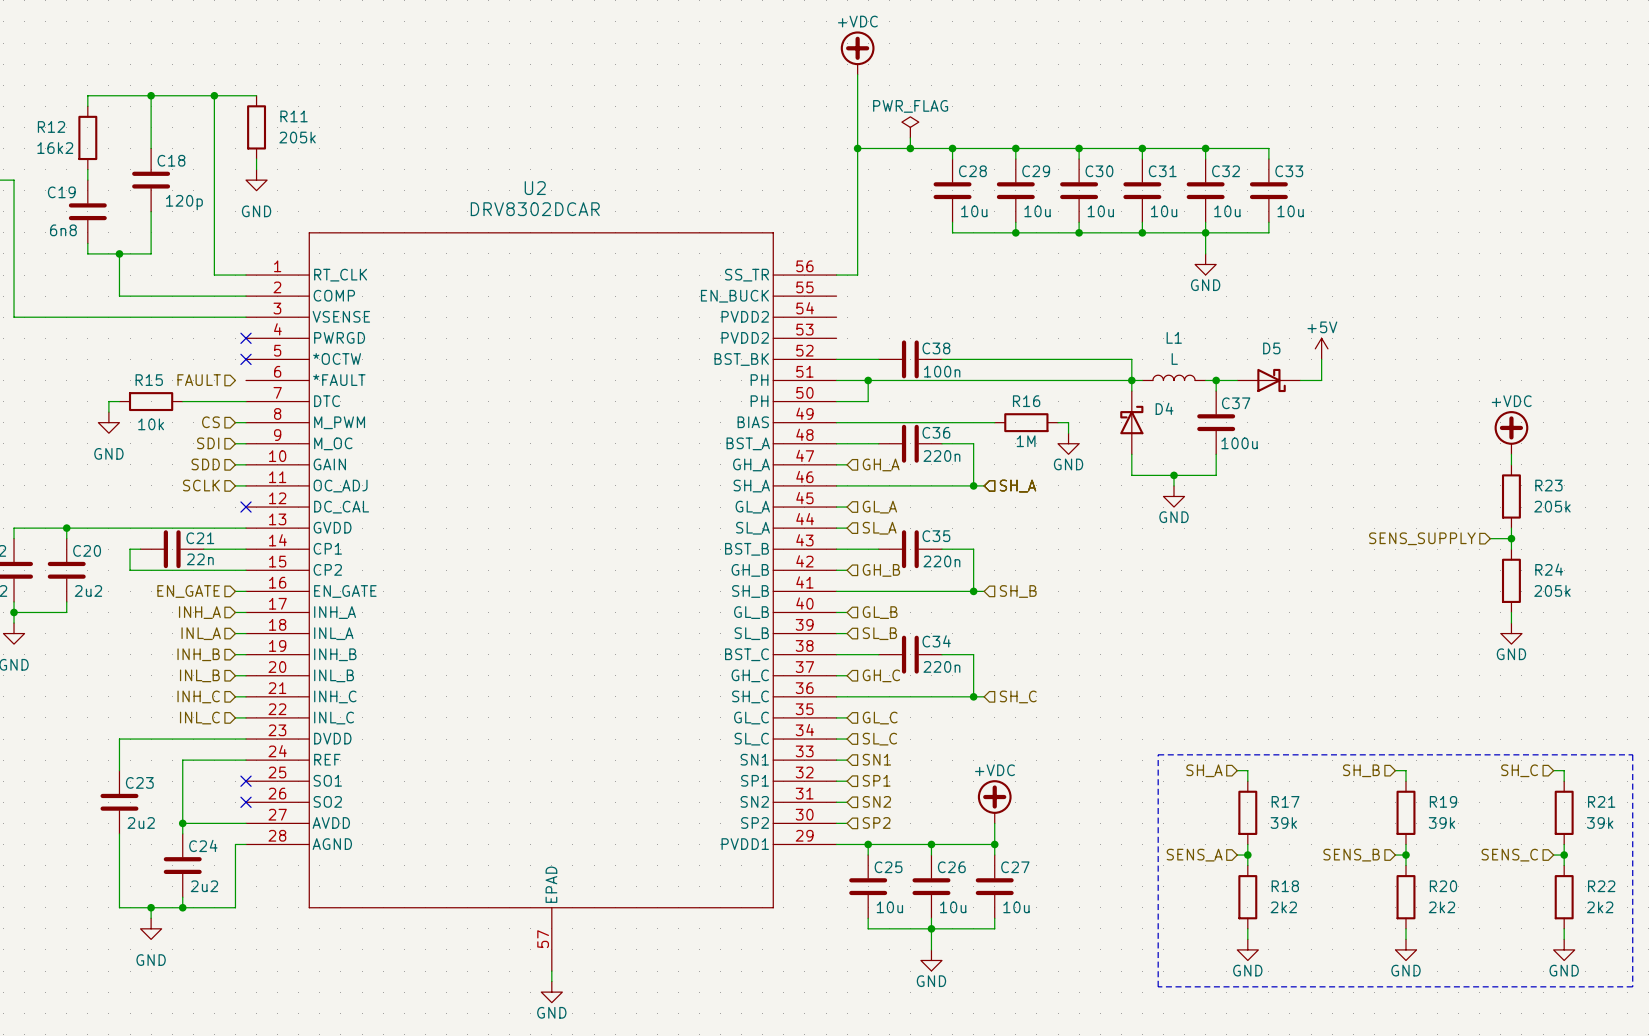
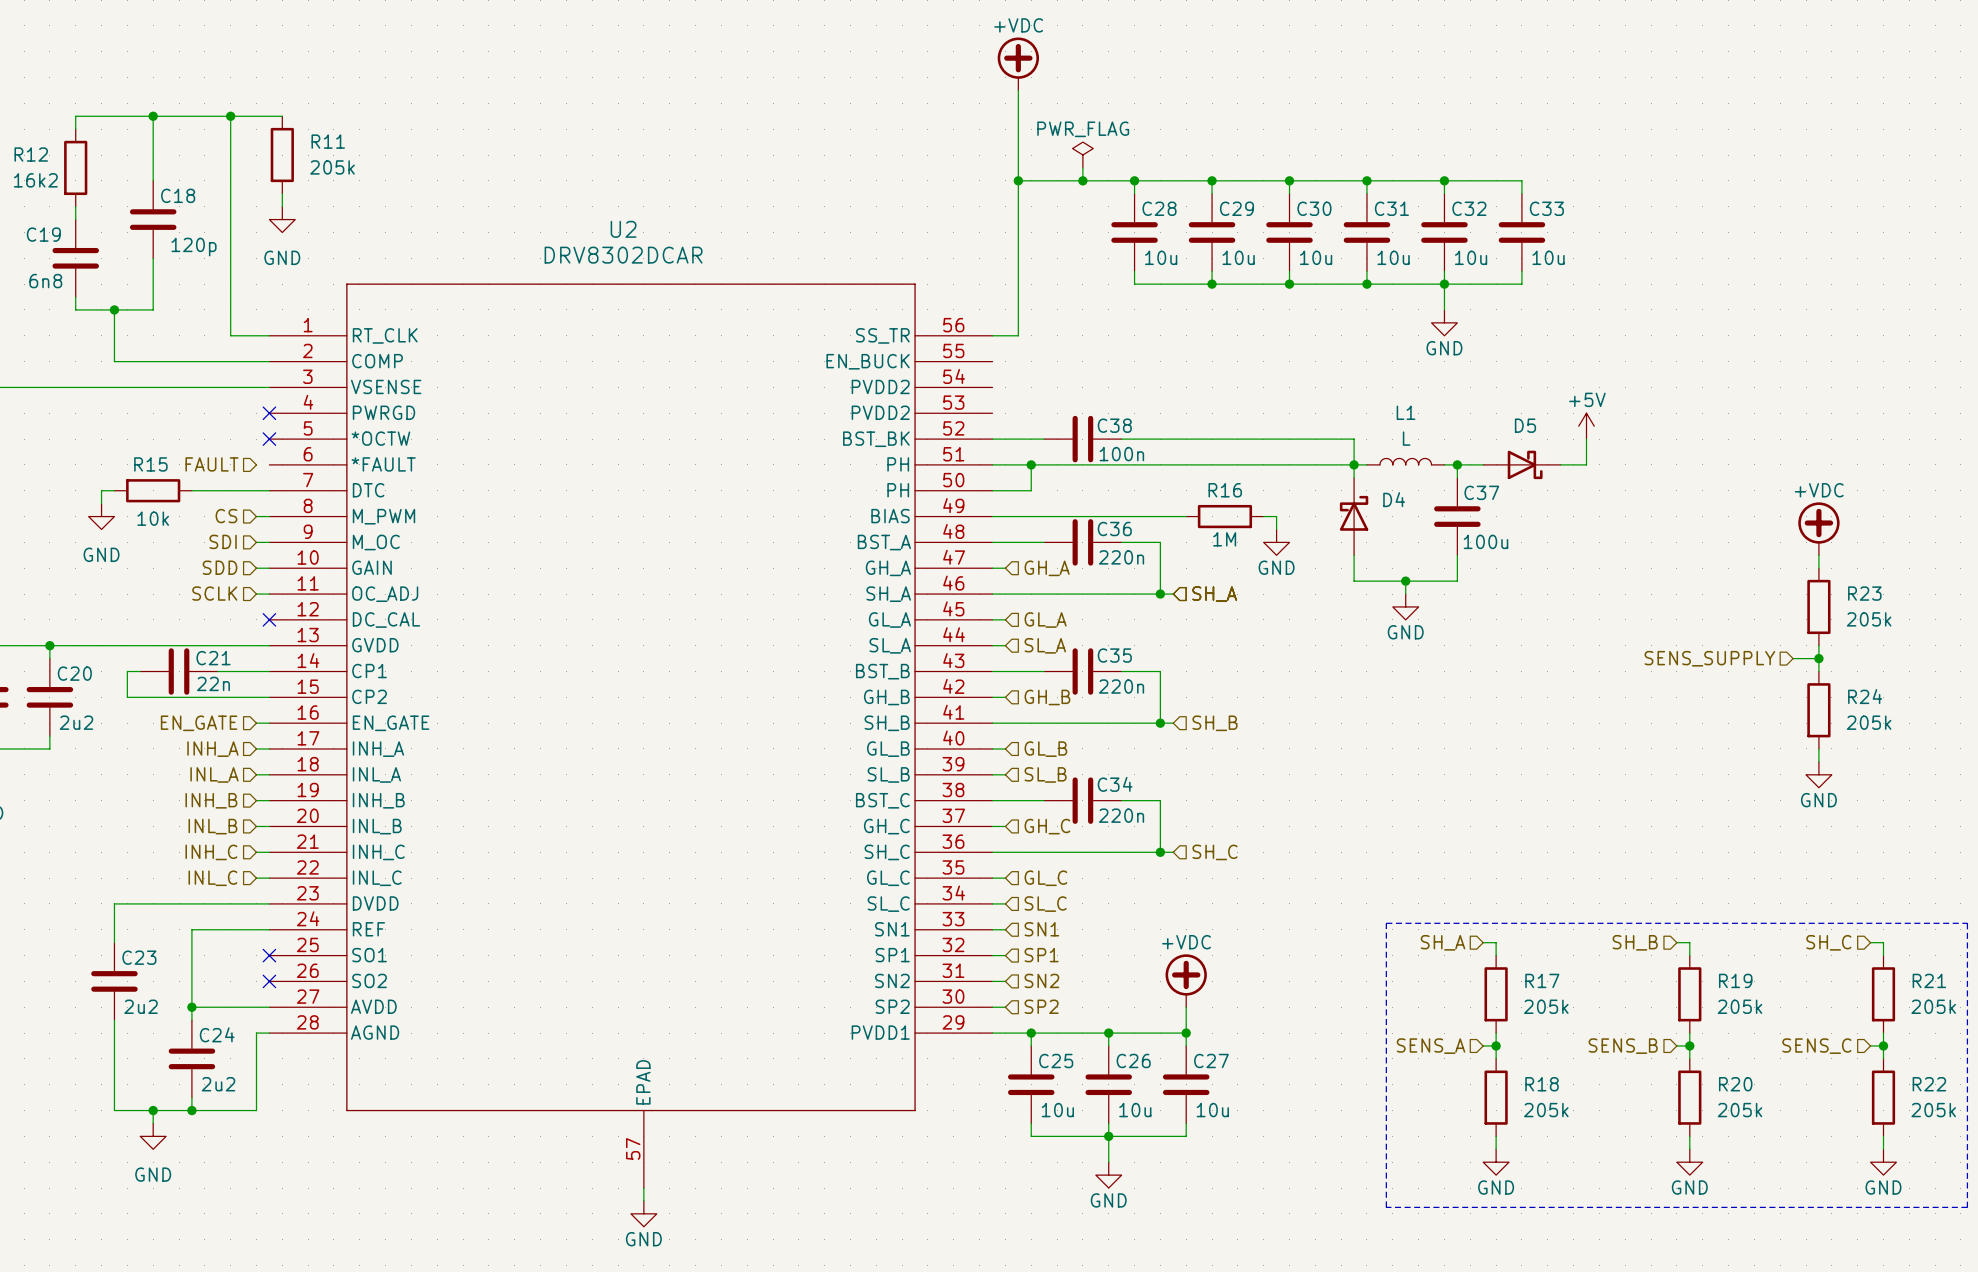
R17 value: 39k (1283, 822) -> 205k (1546, 1006)
R19 value: 39k (1441, 822) -> 205k (1740, 1006)
R21 value: 39k (1600, 822) -> 205k (1933, 1006)
R18 value: 2k2 (1283, 907) -> 205k (1546, 1110)
R20 value: 2k2 (1441, 907) -> 205k (1740, 1110)
R22 value: 2k2 (1600, 907) -> 205k (1933, 1110)

